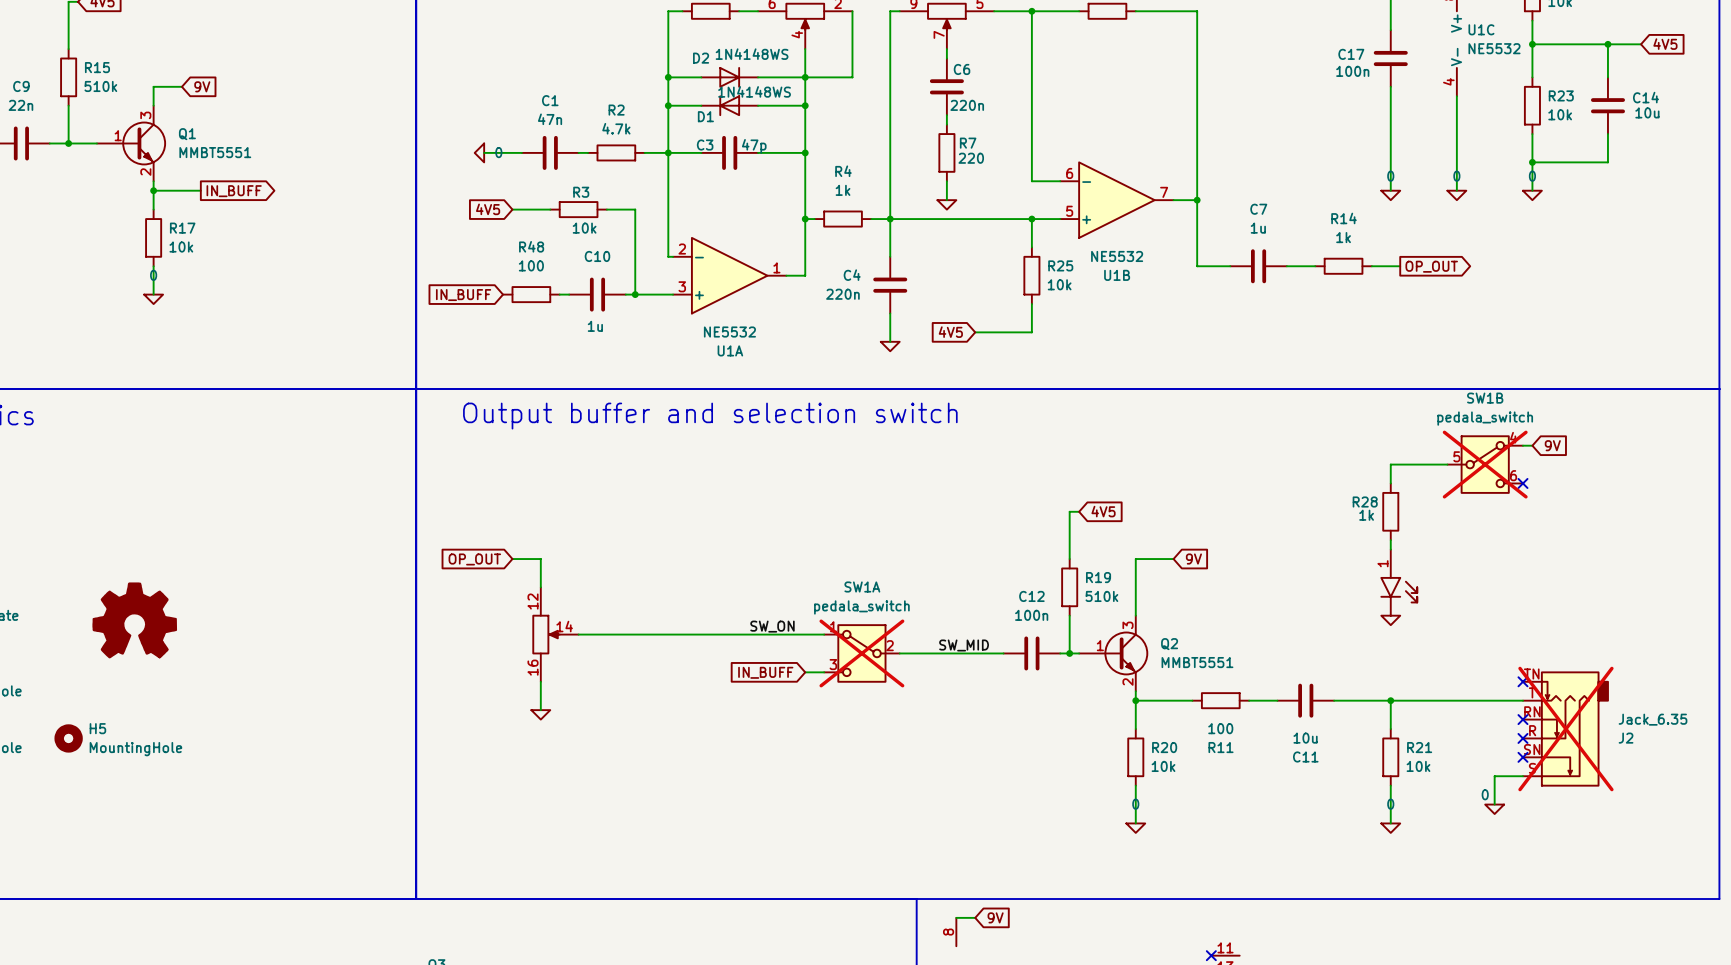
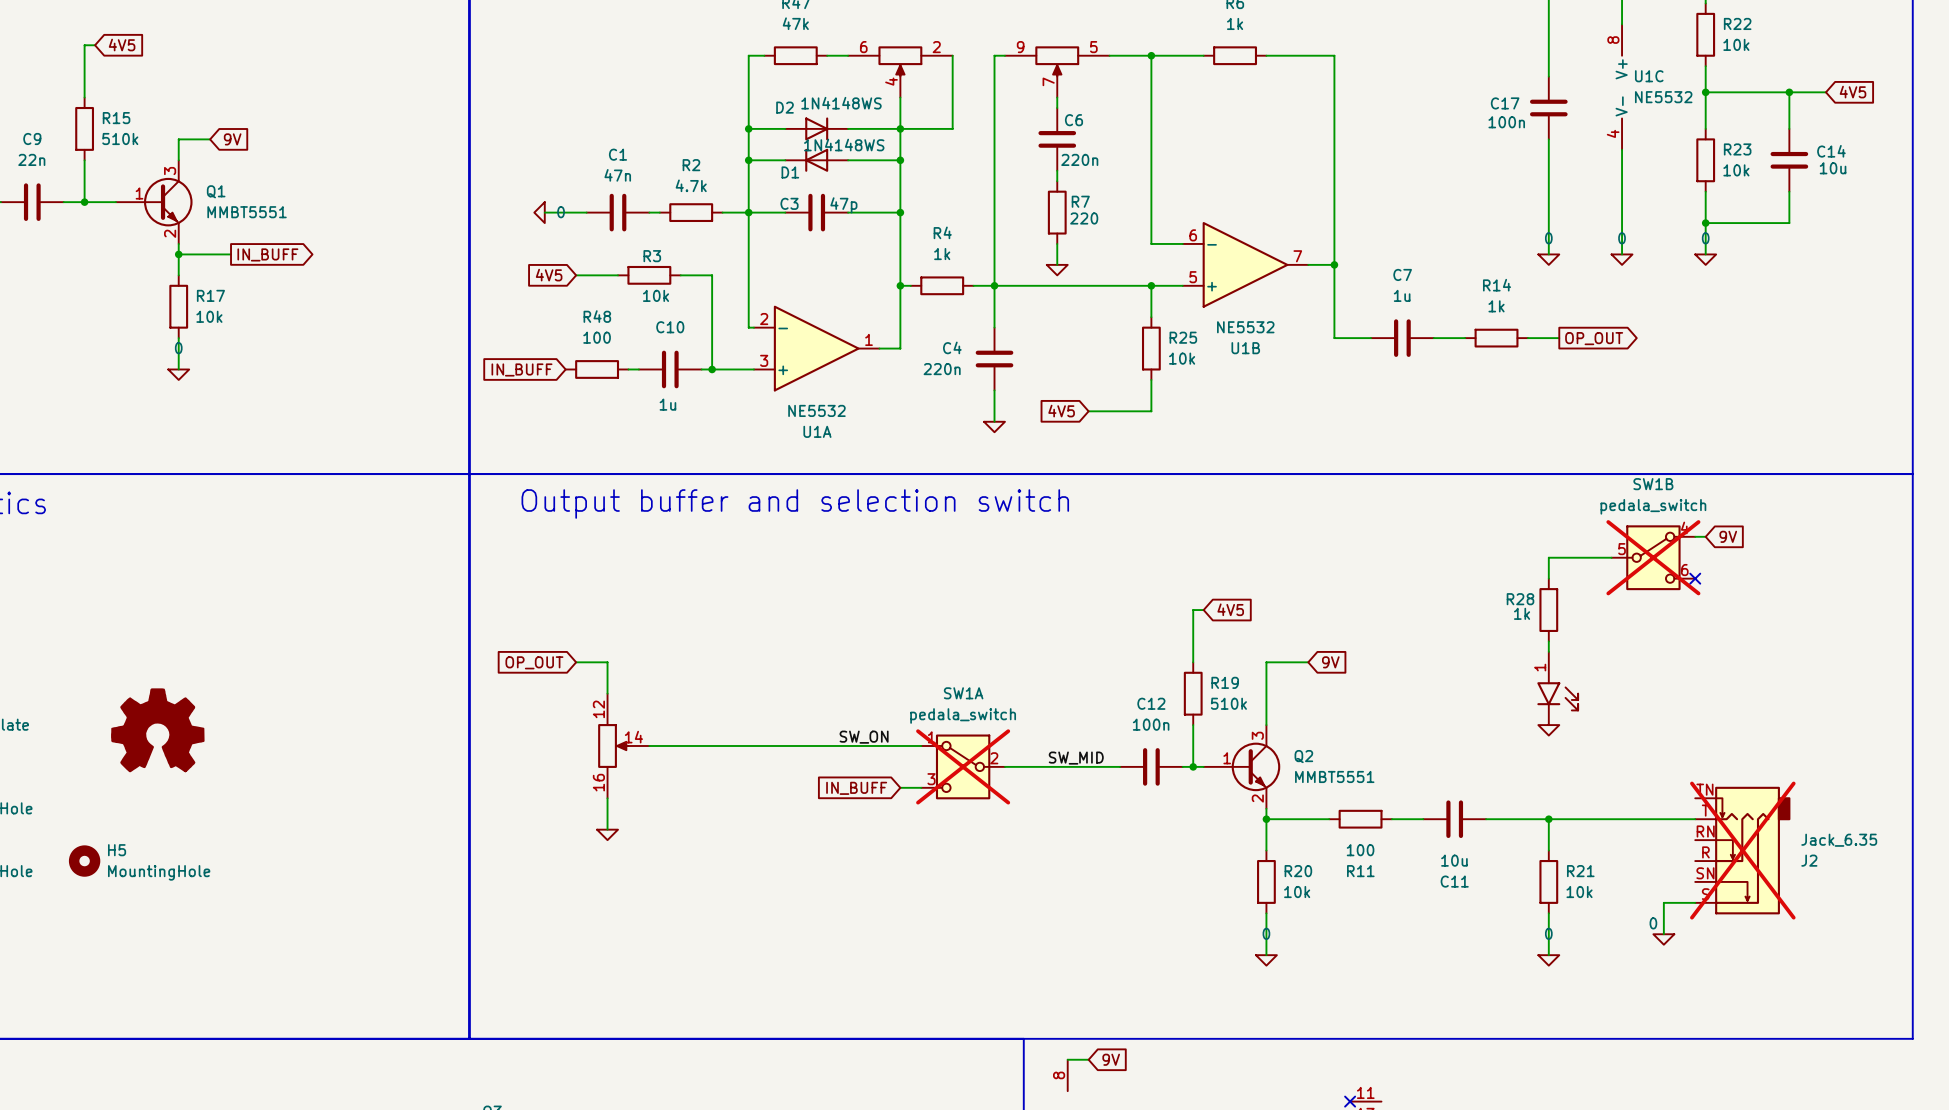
no-connect mark: (1522, 681) -> none
no-connect mark: (1522, 719) -> none
no-connect mark: (1522, 738) -> none
no-connect mark: (1522, 757) -> none

